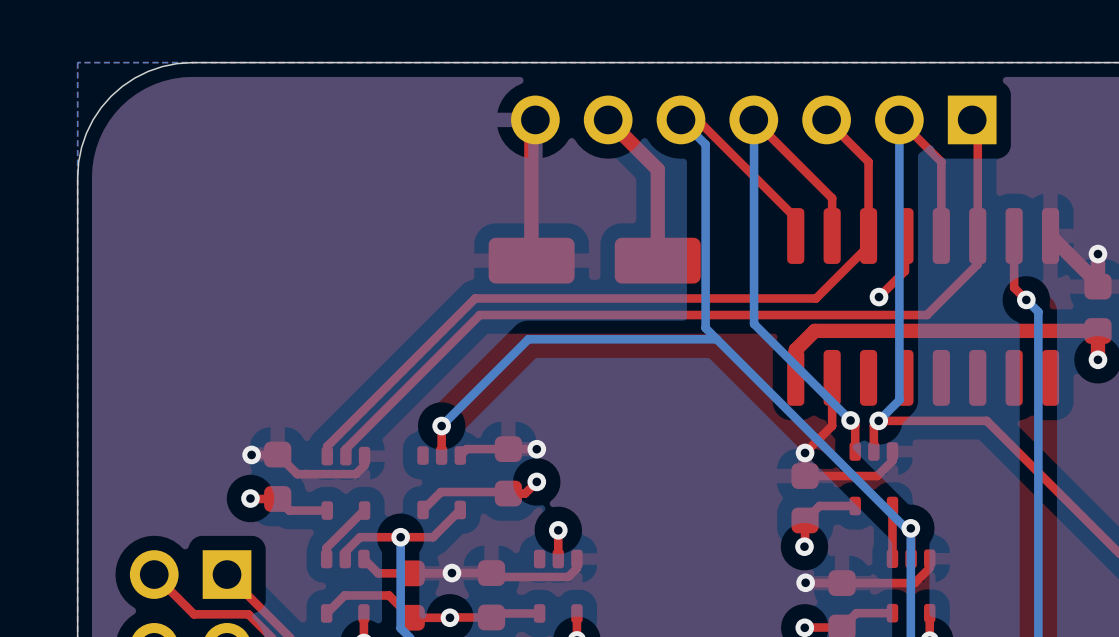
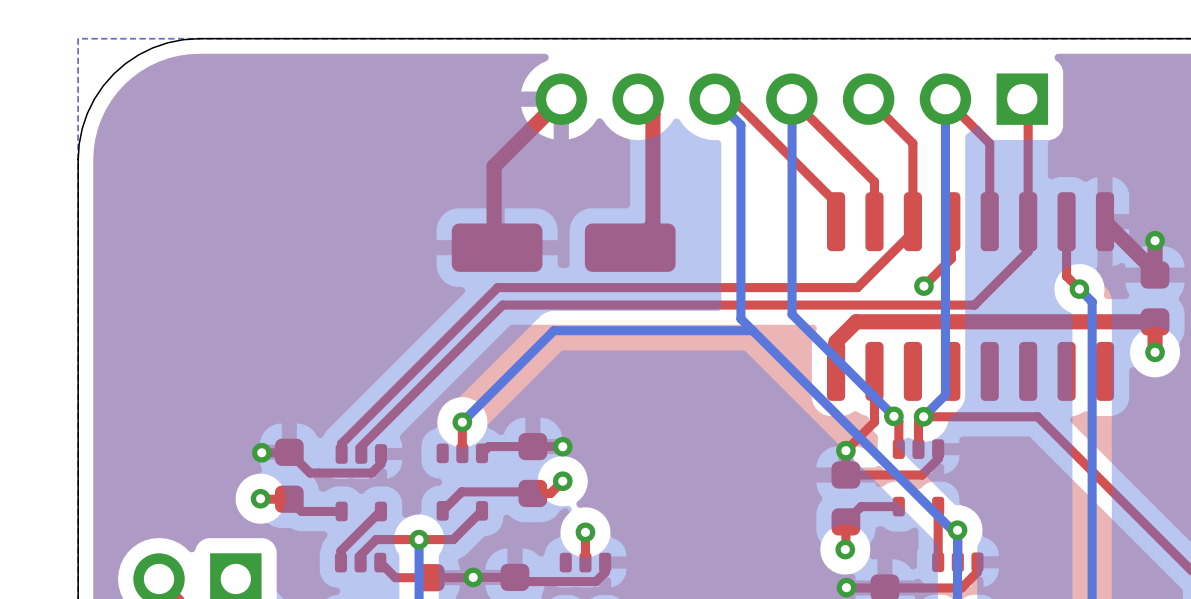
top track: (531, 123) (531, 260) -> (557, 103) (494, 166) (494, 244) (497, 247)
top track: (622, 133) (657, 169) (657, 260) -> (652, 113) (652, 224) (630, 247)
part position: (594, 260) -> (563, 247)

